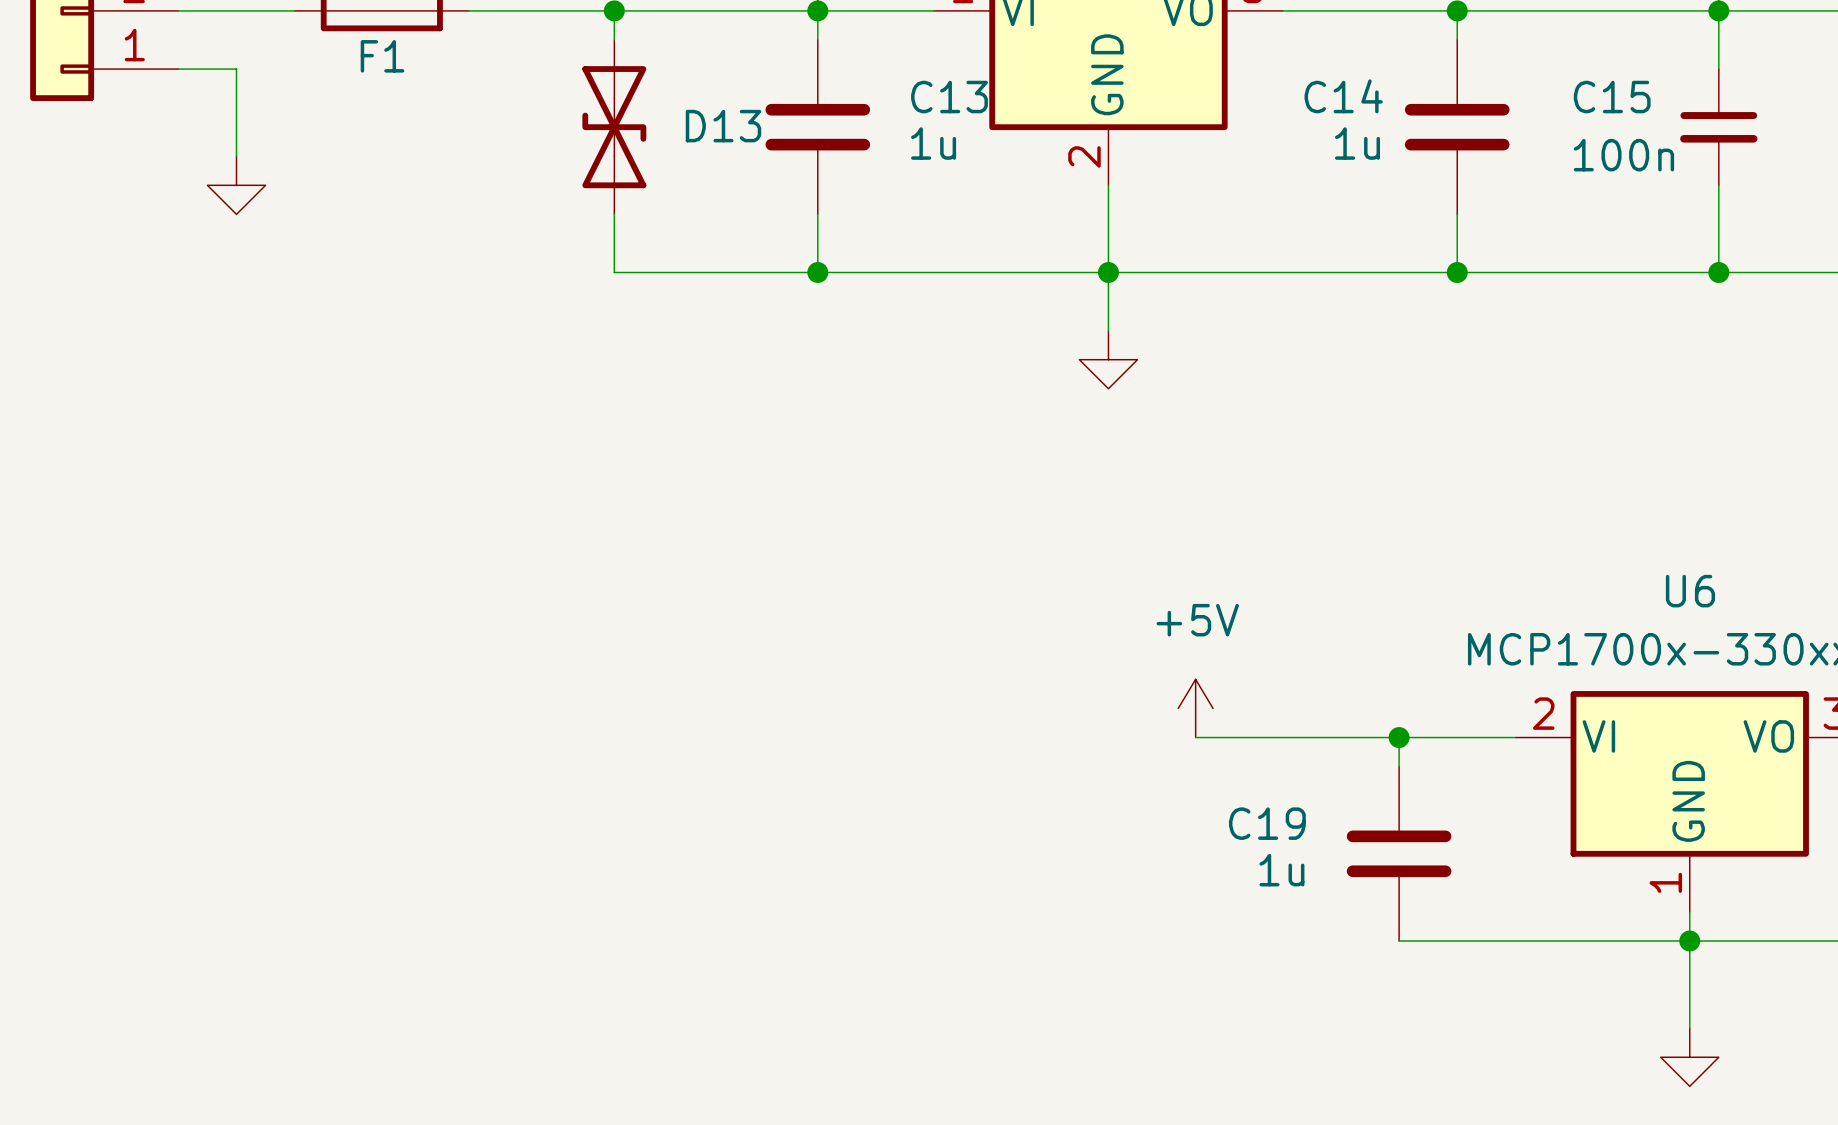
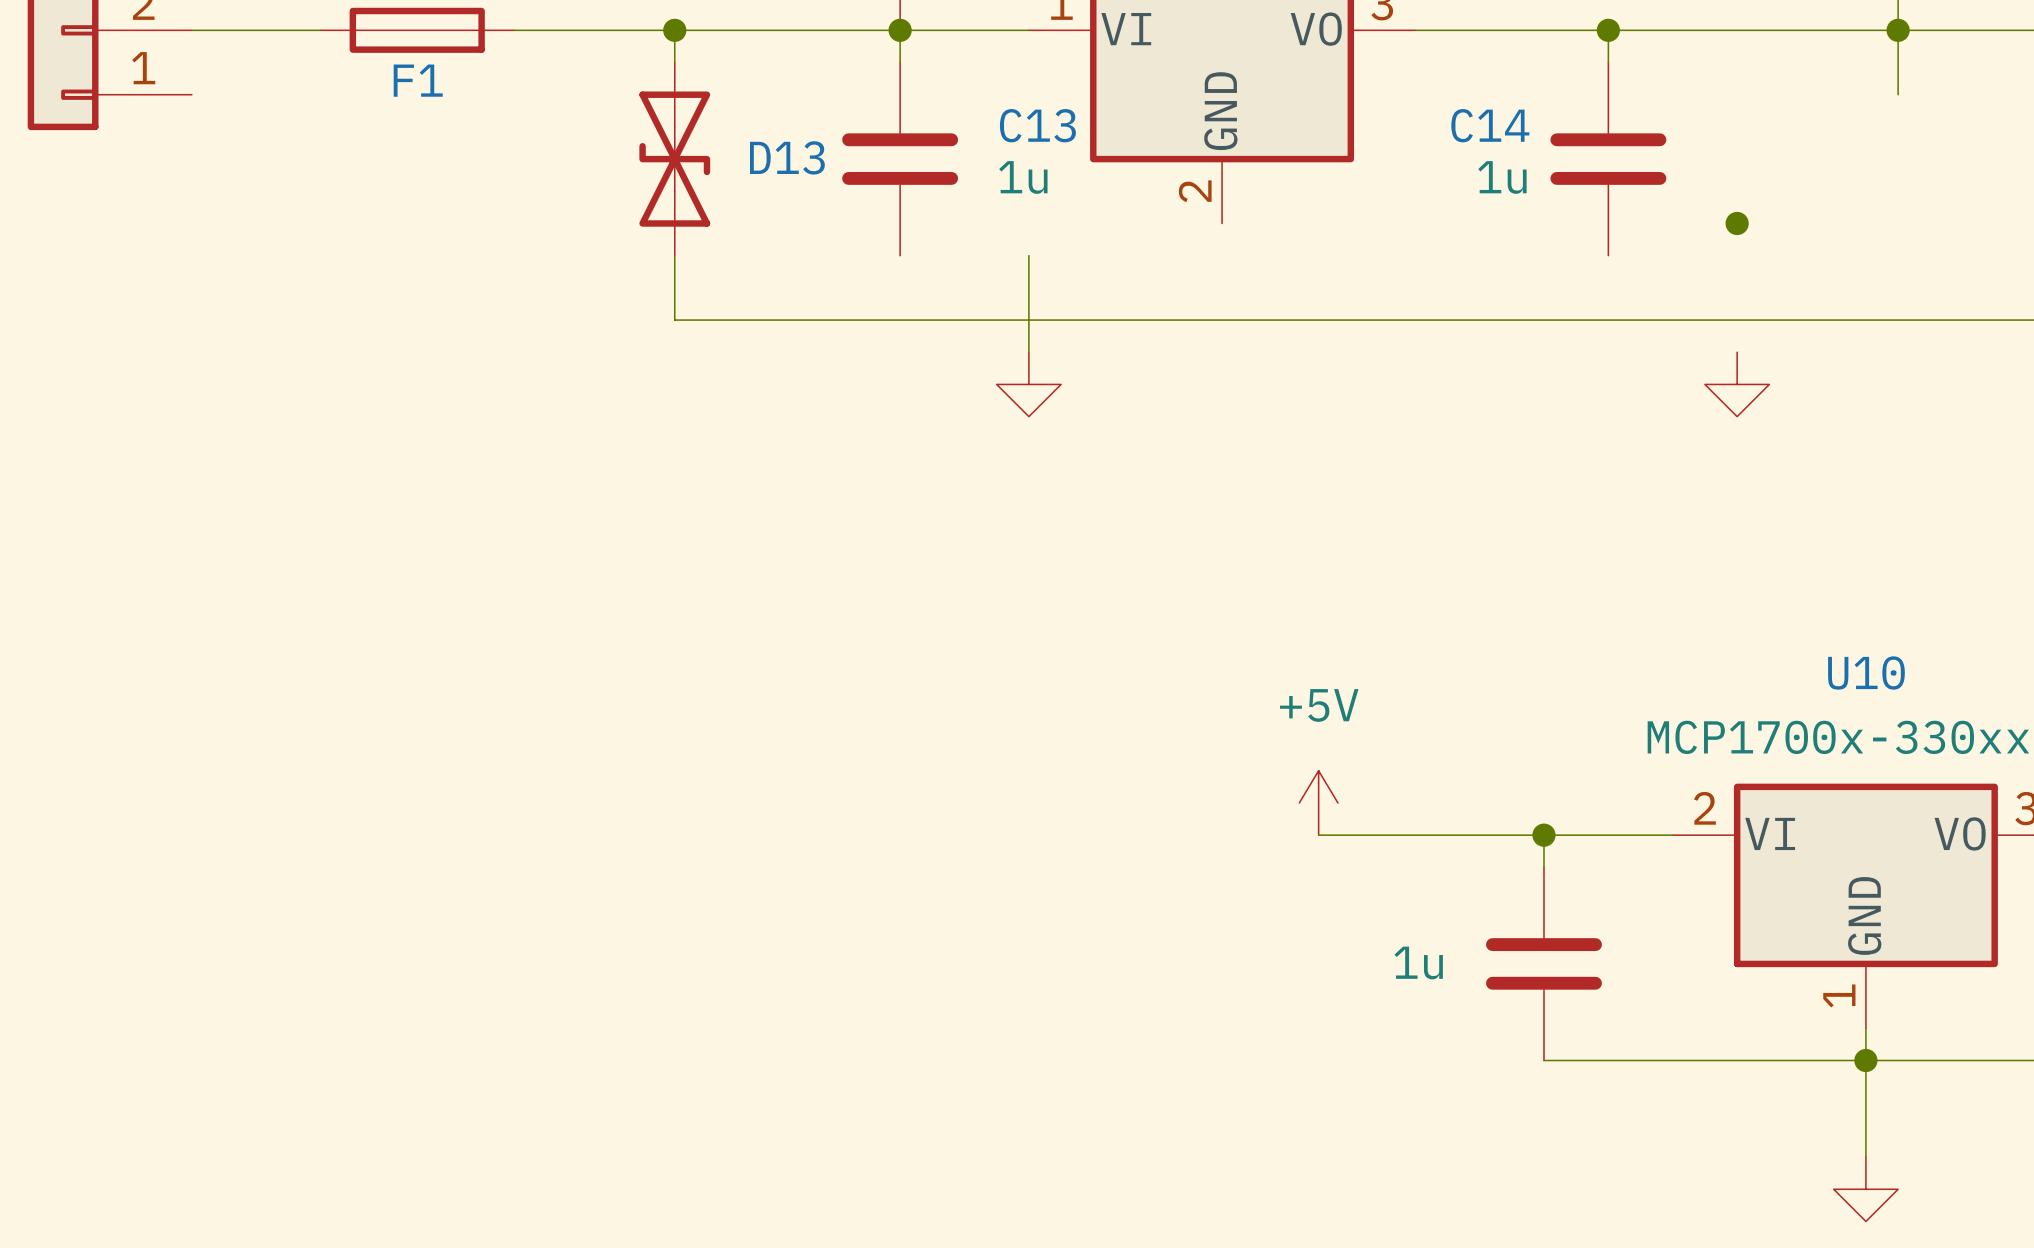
wire: (178, 69) (236, 69) (236, 156) -> none
C15: 100n (1718, 127) -> none
power symbol: (236, 185) -> none
wire: (1108, 185) (1108, 330) -> none
junction: none -> (1737, 223)
wire: (1718, 185) (1718, 272) -> none
wire: (817, 214) (817, 272) -> none
wire: none -> (1028, 255) (1028, 352)
wire: (1457, 214) (1457, 272) -> none
junction: (817, 272) -> none
junction: (1108, 272) -> none
junction: (1457, 272) -> none
junction: (1718, 272) -> none
power symbol: none -> (1737, 384)
power symbol position: (1108, 359) -> (1028, 384)
U6 name: U6 (1690, 591) -> U10 (1866, 672)
C19 name: C19 (1267, 823) -> none
C19 value position: 1u (1281, 870) -> 1u (1418, 963)

